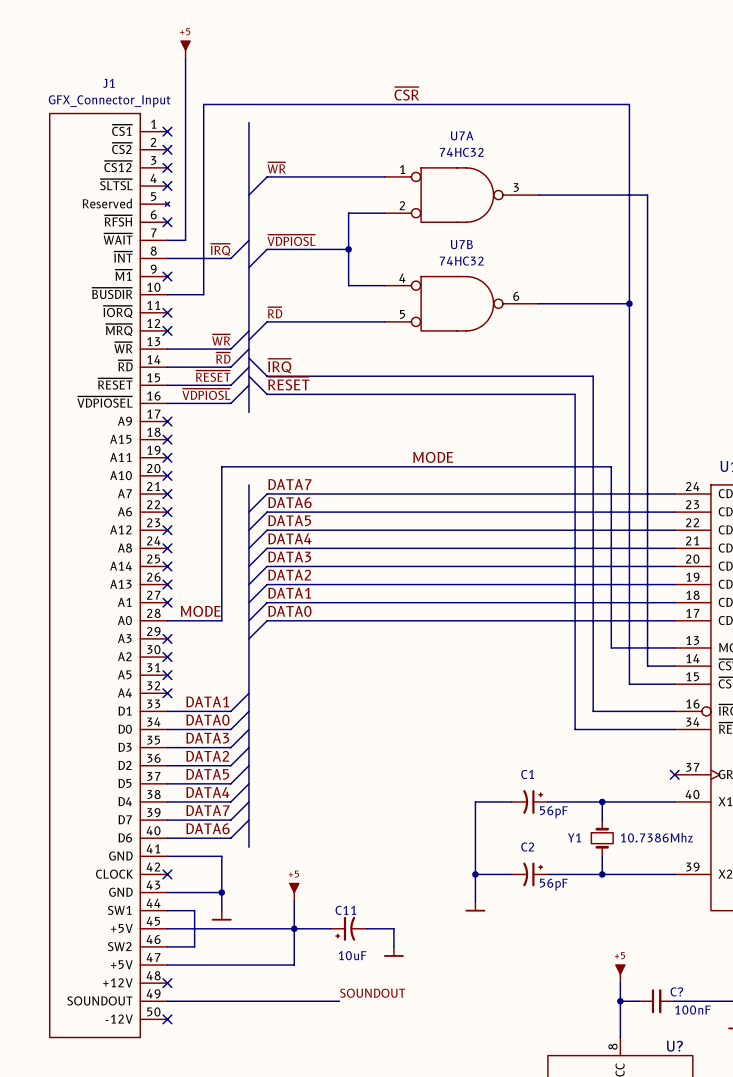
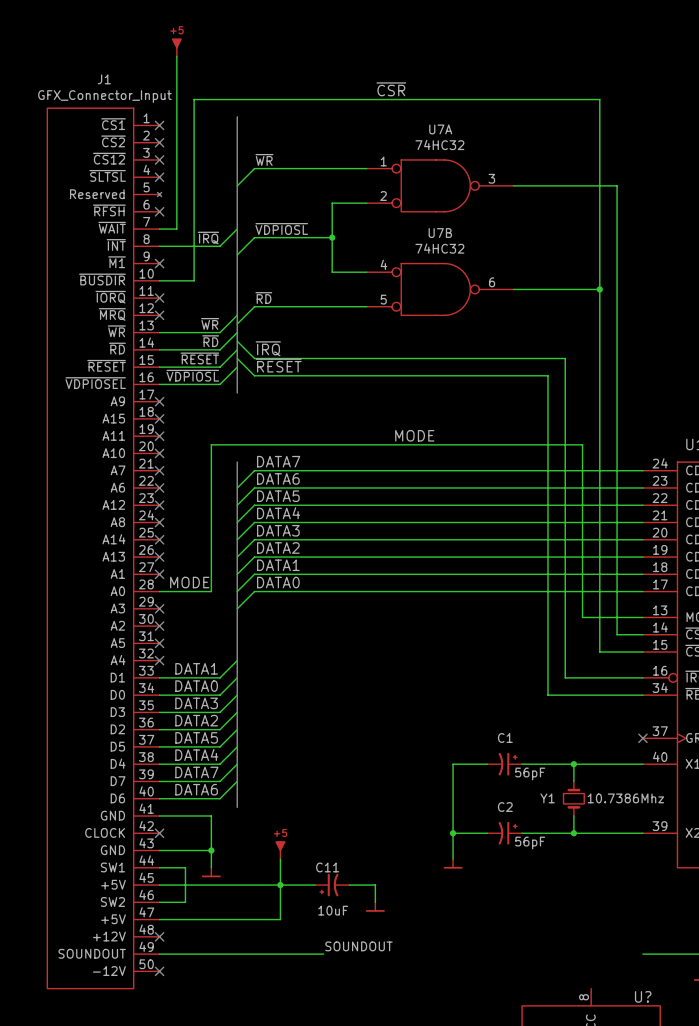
power symbol: (620, 974) -> none
wire: (620, 983) (620, 1037) -> none
wire: (620, 1001) (638, 1001) -> none
junction: (620, 1001) -> none
C?: 100nF (656, 1001) -> none

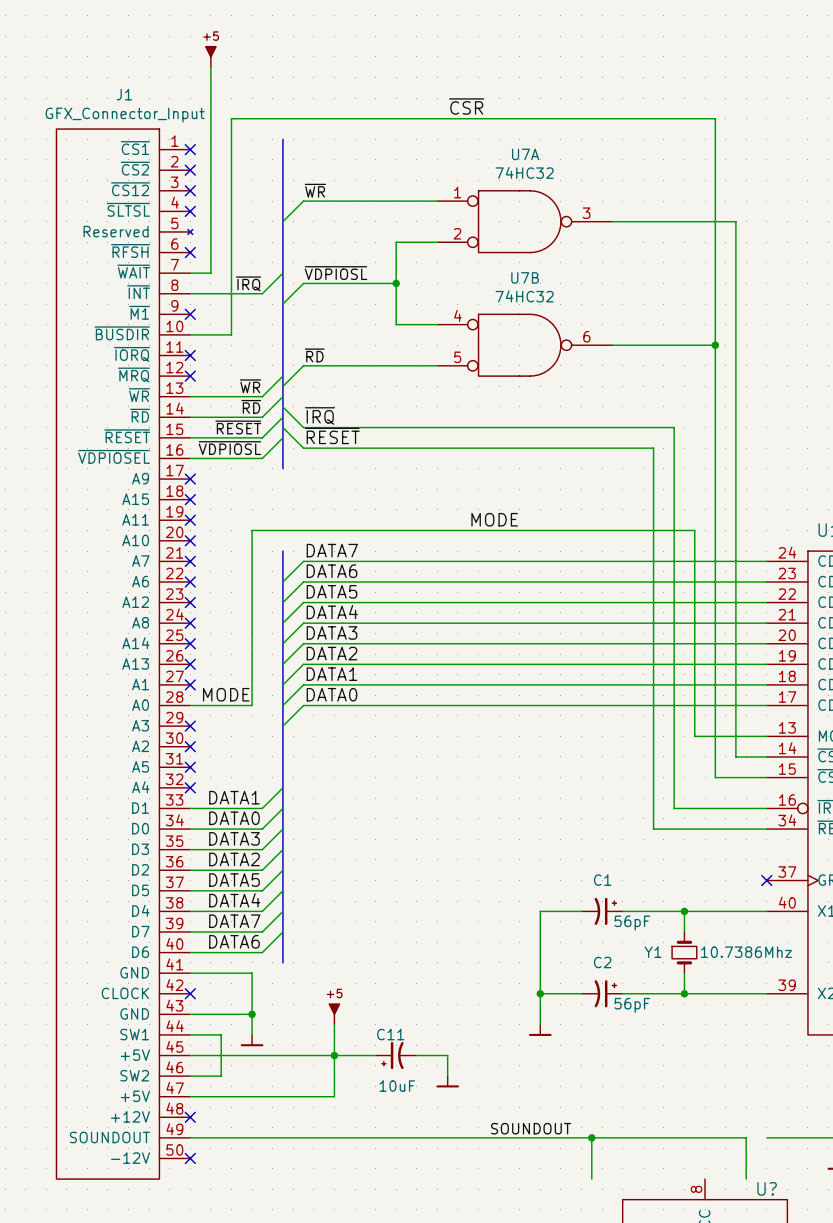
label position: SOUNDOUT (358, 946) -> SOUNDOUT (531, 1128)
wire: none -> (385, 1137) (746, 1137) (746, 1179)
wire: none -> (591, 1137) (591, 1179)
junction: none -> (591, 1137)

